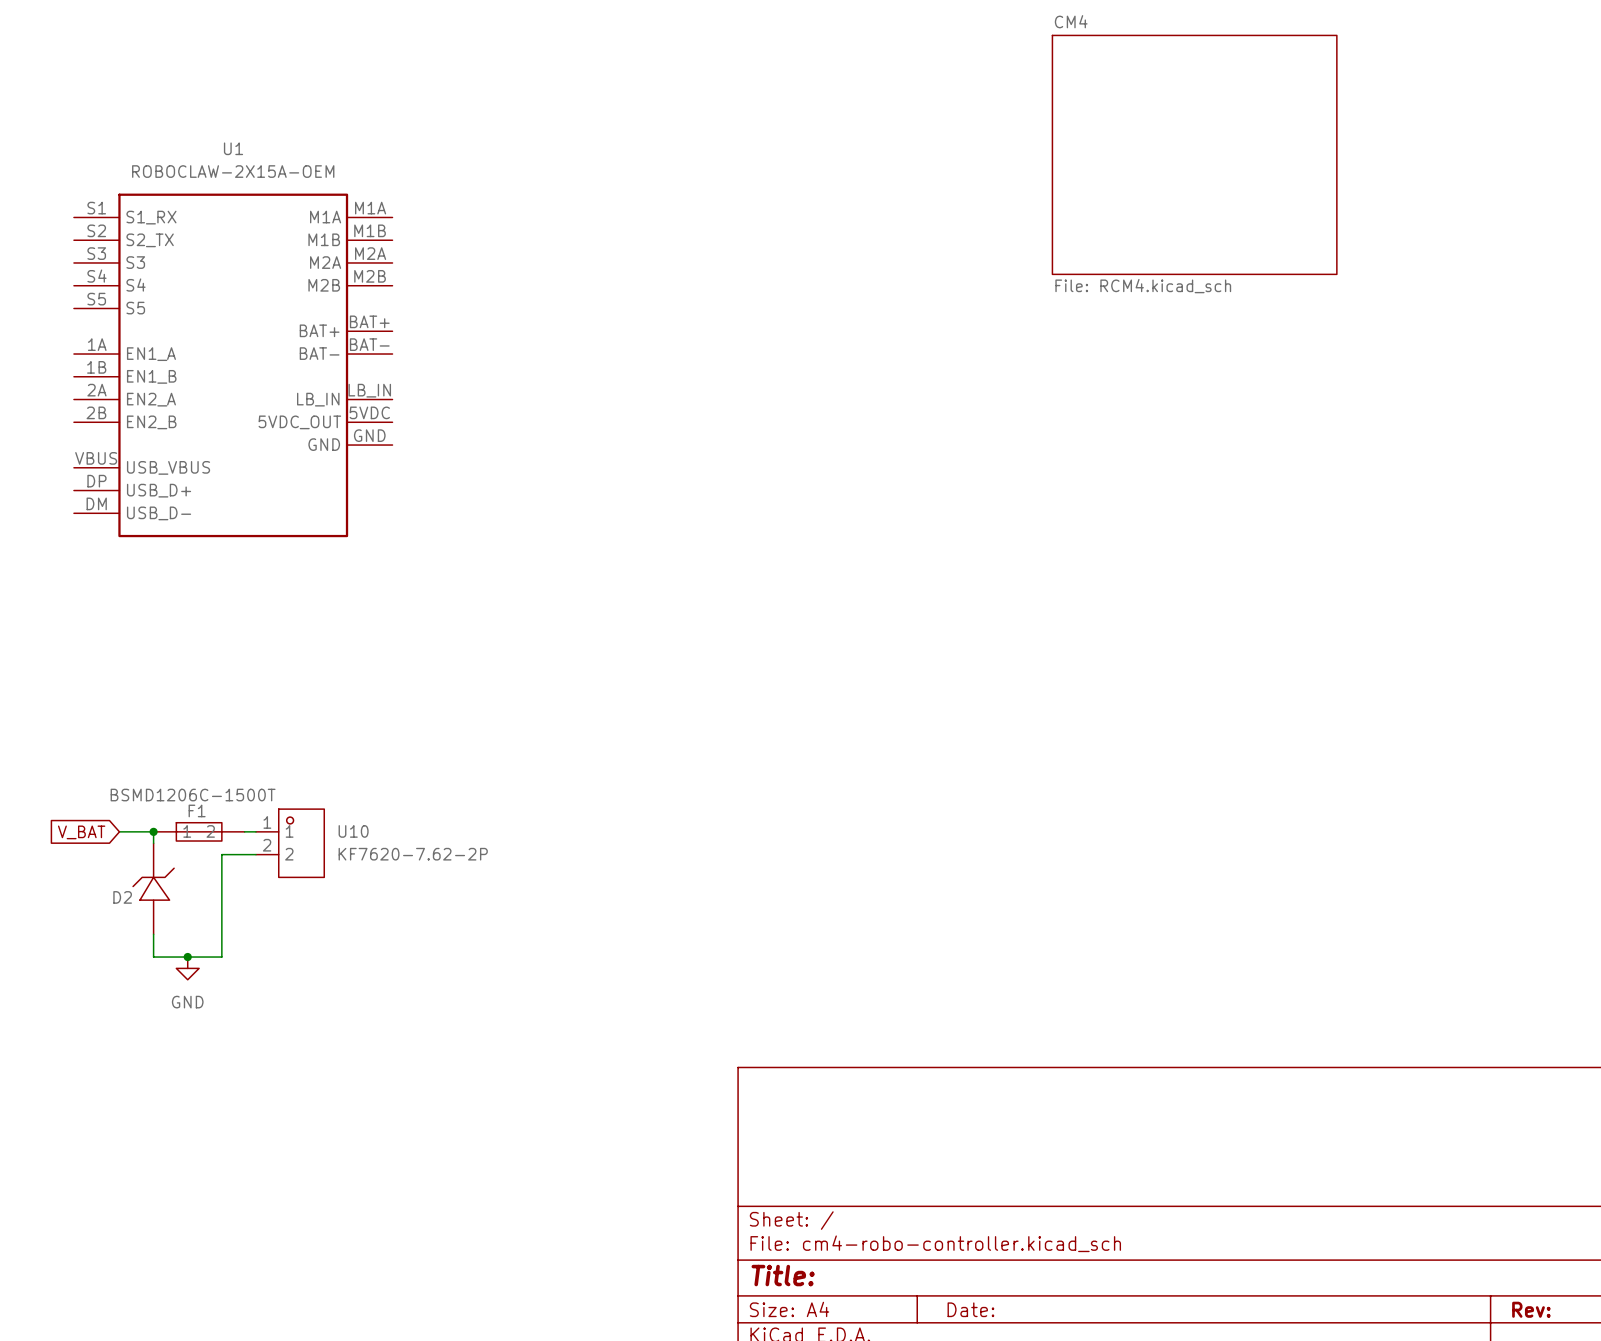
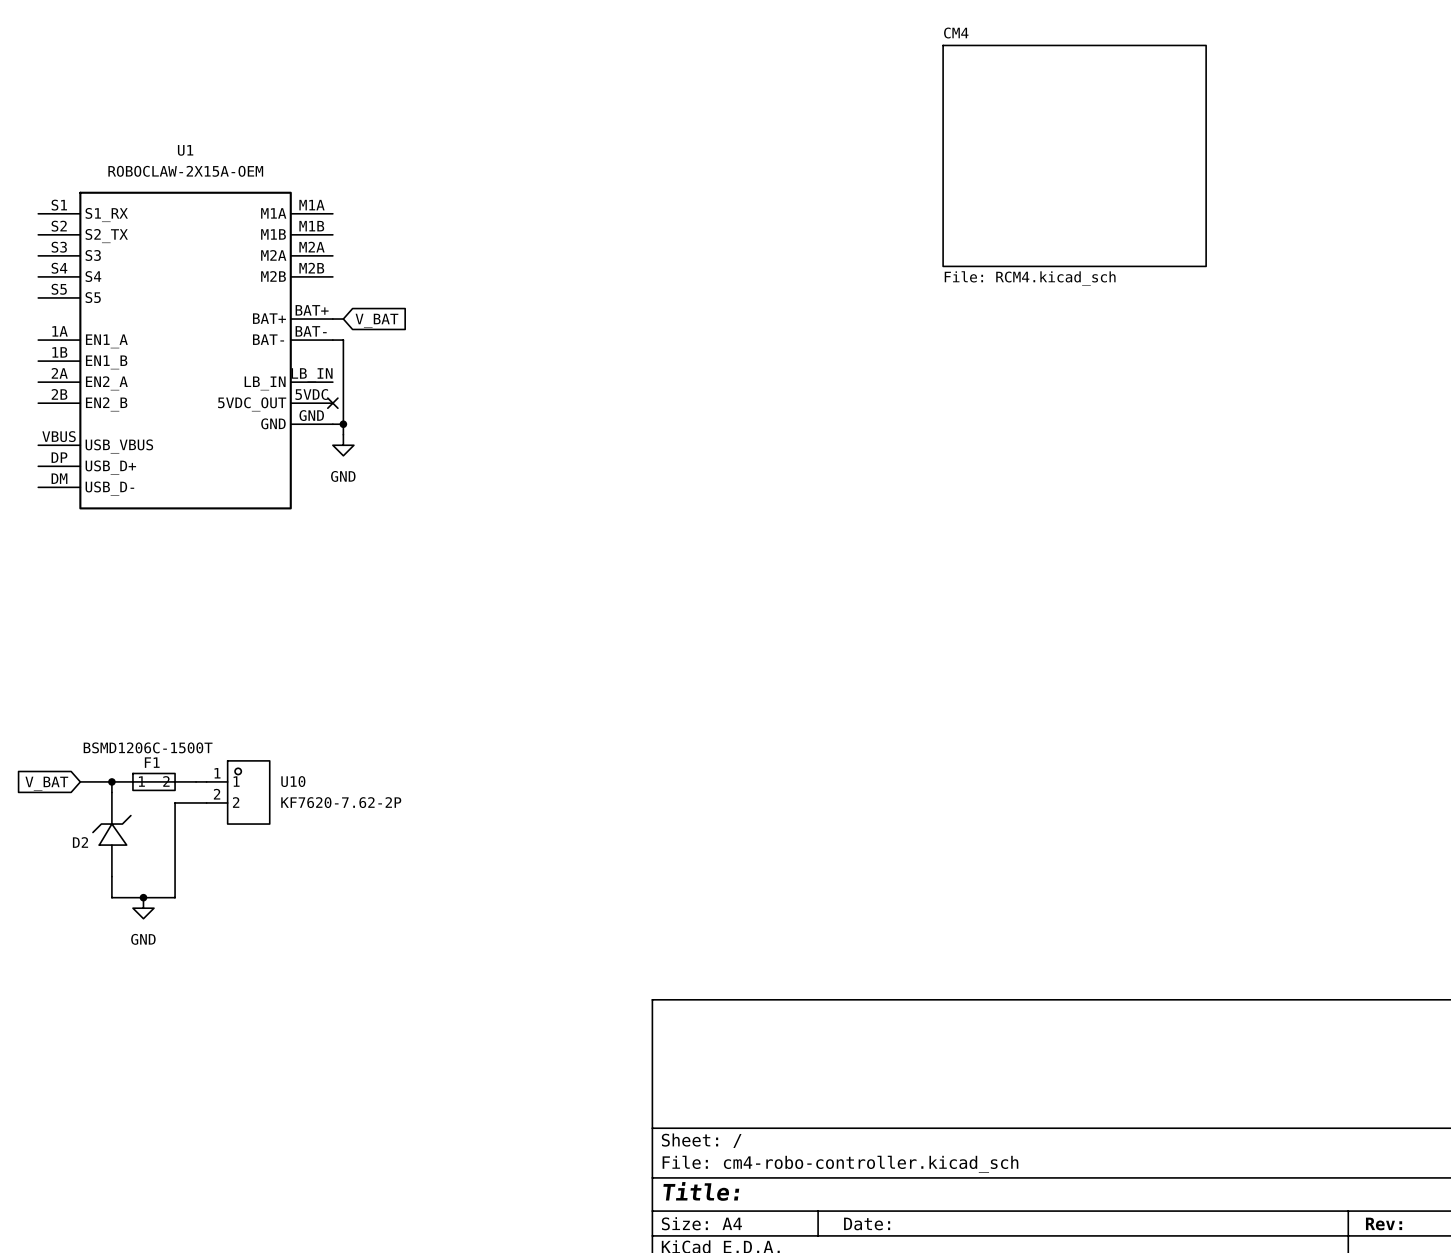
wire: none -> (332, 319) (343, 319)
global label: none -> V_BAT (376, 320)
wire: none -> (332, 340) (343, 340) (343, 434)
no-connect mark: none -> (332, 403)
wire: none -> (332, 424) (343, 424)
junction: none -> (343, 424)
power symbol: none -> GND (343, 445)

